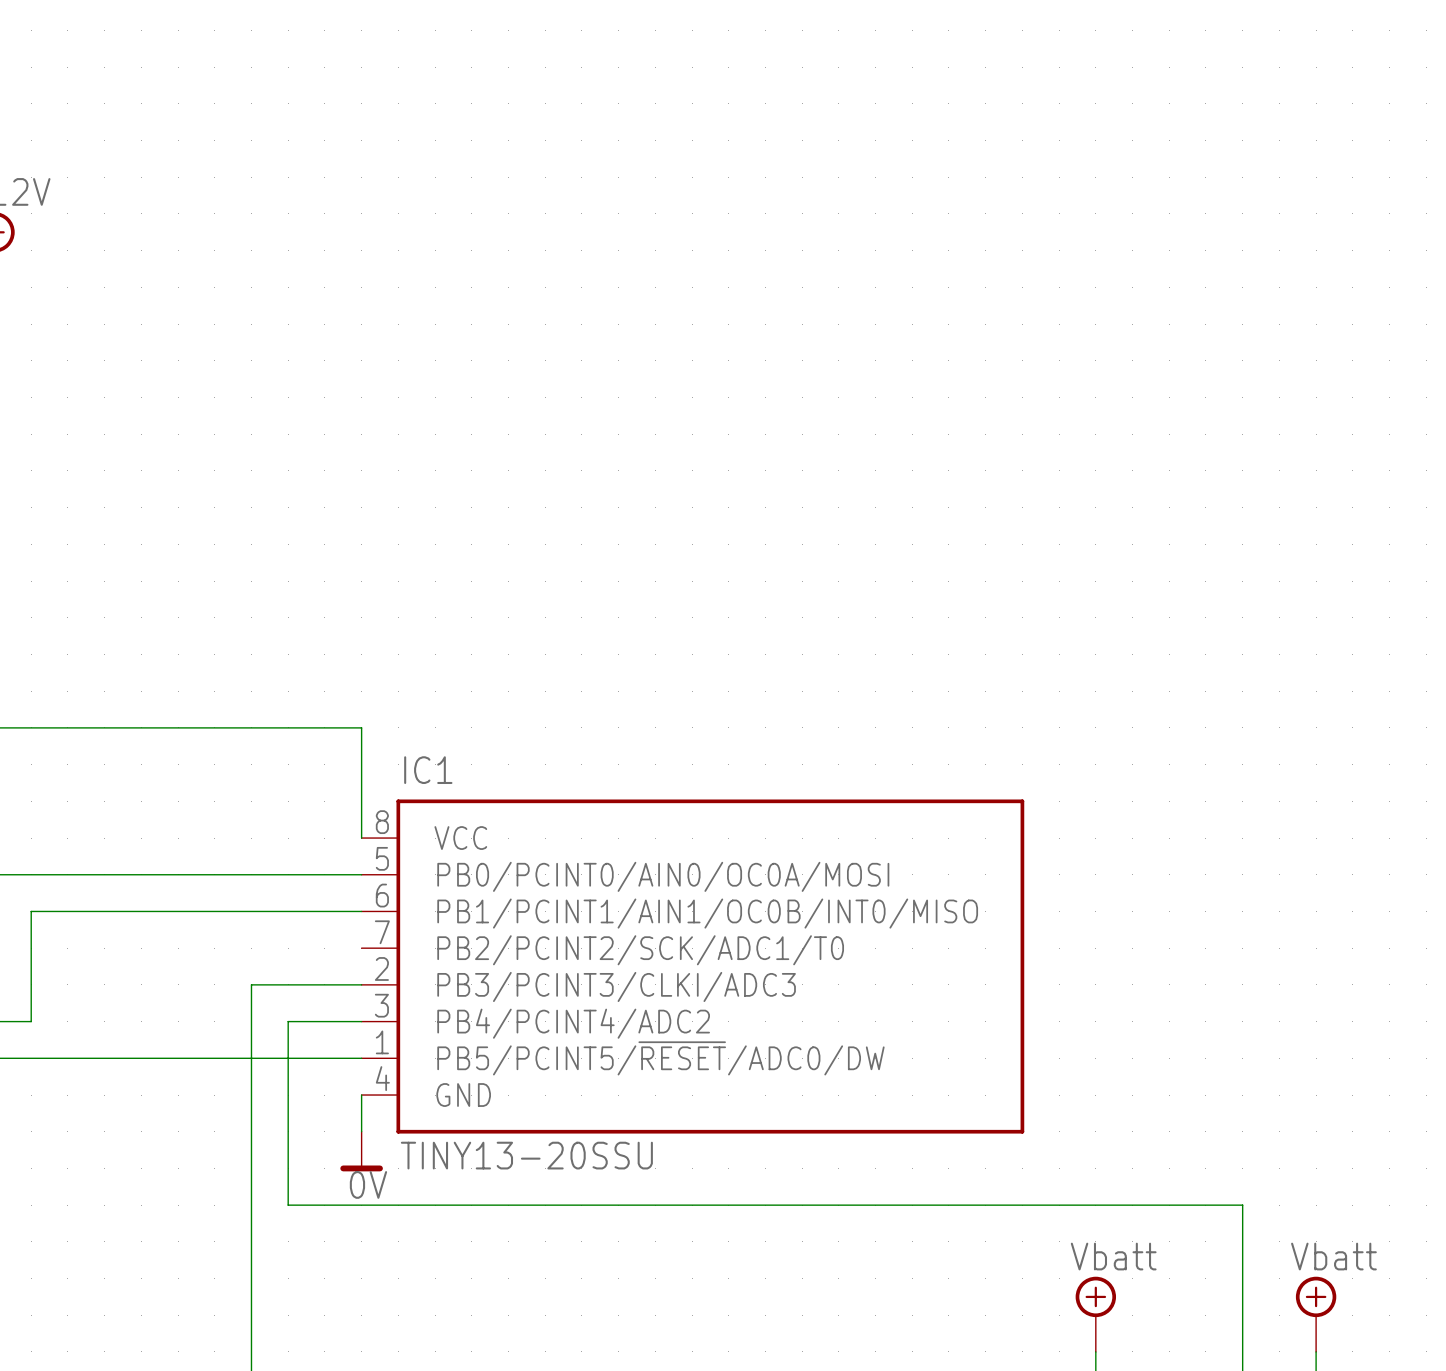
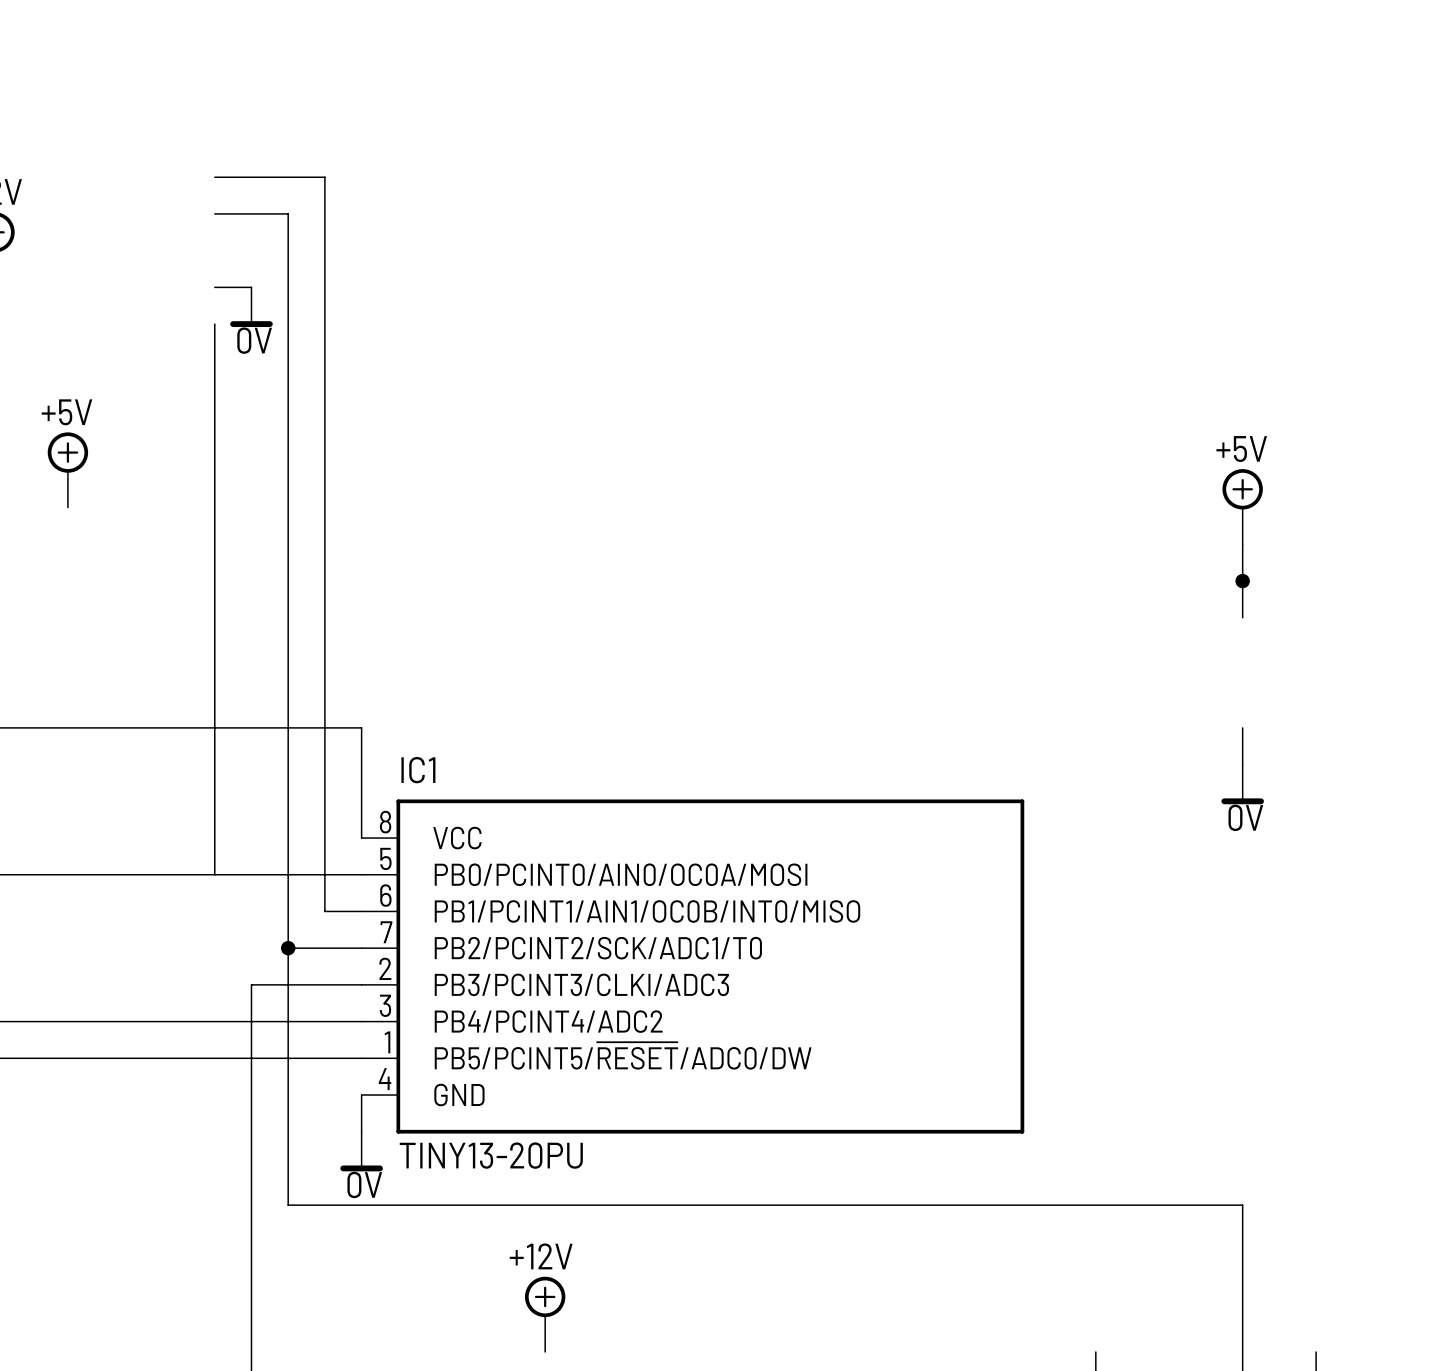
wire: none -> (214, 177) (324, 177) (324, 911)
wire: none -> (214, 287) (251, 287)
power symbol: none -> 0V (251, 307)
wire: none -> (214, 324) (214, 874)
power symbol: none -> +5V (67, 470)
power symbol: none -> +5V (1242, 506)
wire: none -> (1242, 544) (1242, 617)
junction: none -> (1242, 581)
wire: none -> (1242, 727) (1242, 764)
power symbol: none -> 0V (1242, 784)
wire: (324, 911) (31, 911) (31, 1021) -> (214, 213) (288, 213) (288, 1021) (31, 1021)
wire: none -> (288, 948) (361, 948)
junction: none -> (288, 948)
IC1 value: TINY13-20SSU (526, 1155) -> TINY13-20PU (491, 1155)
power symbol: none -> +12V (545, 1314)
power symbol: Vbatt (1095, 1314) -> none
power symbol: Vbatt (1316, 1314) -> none

